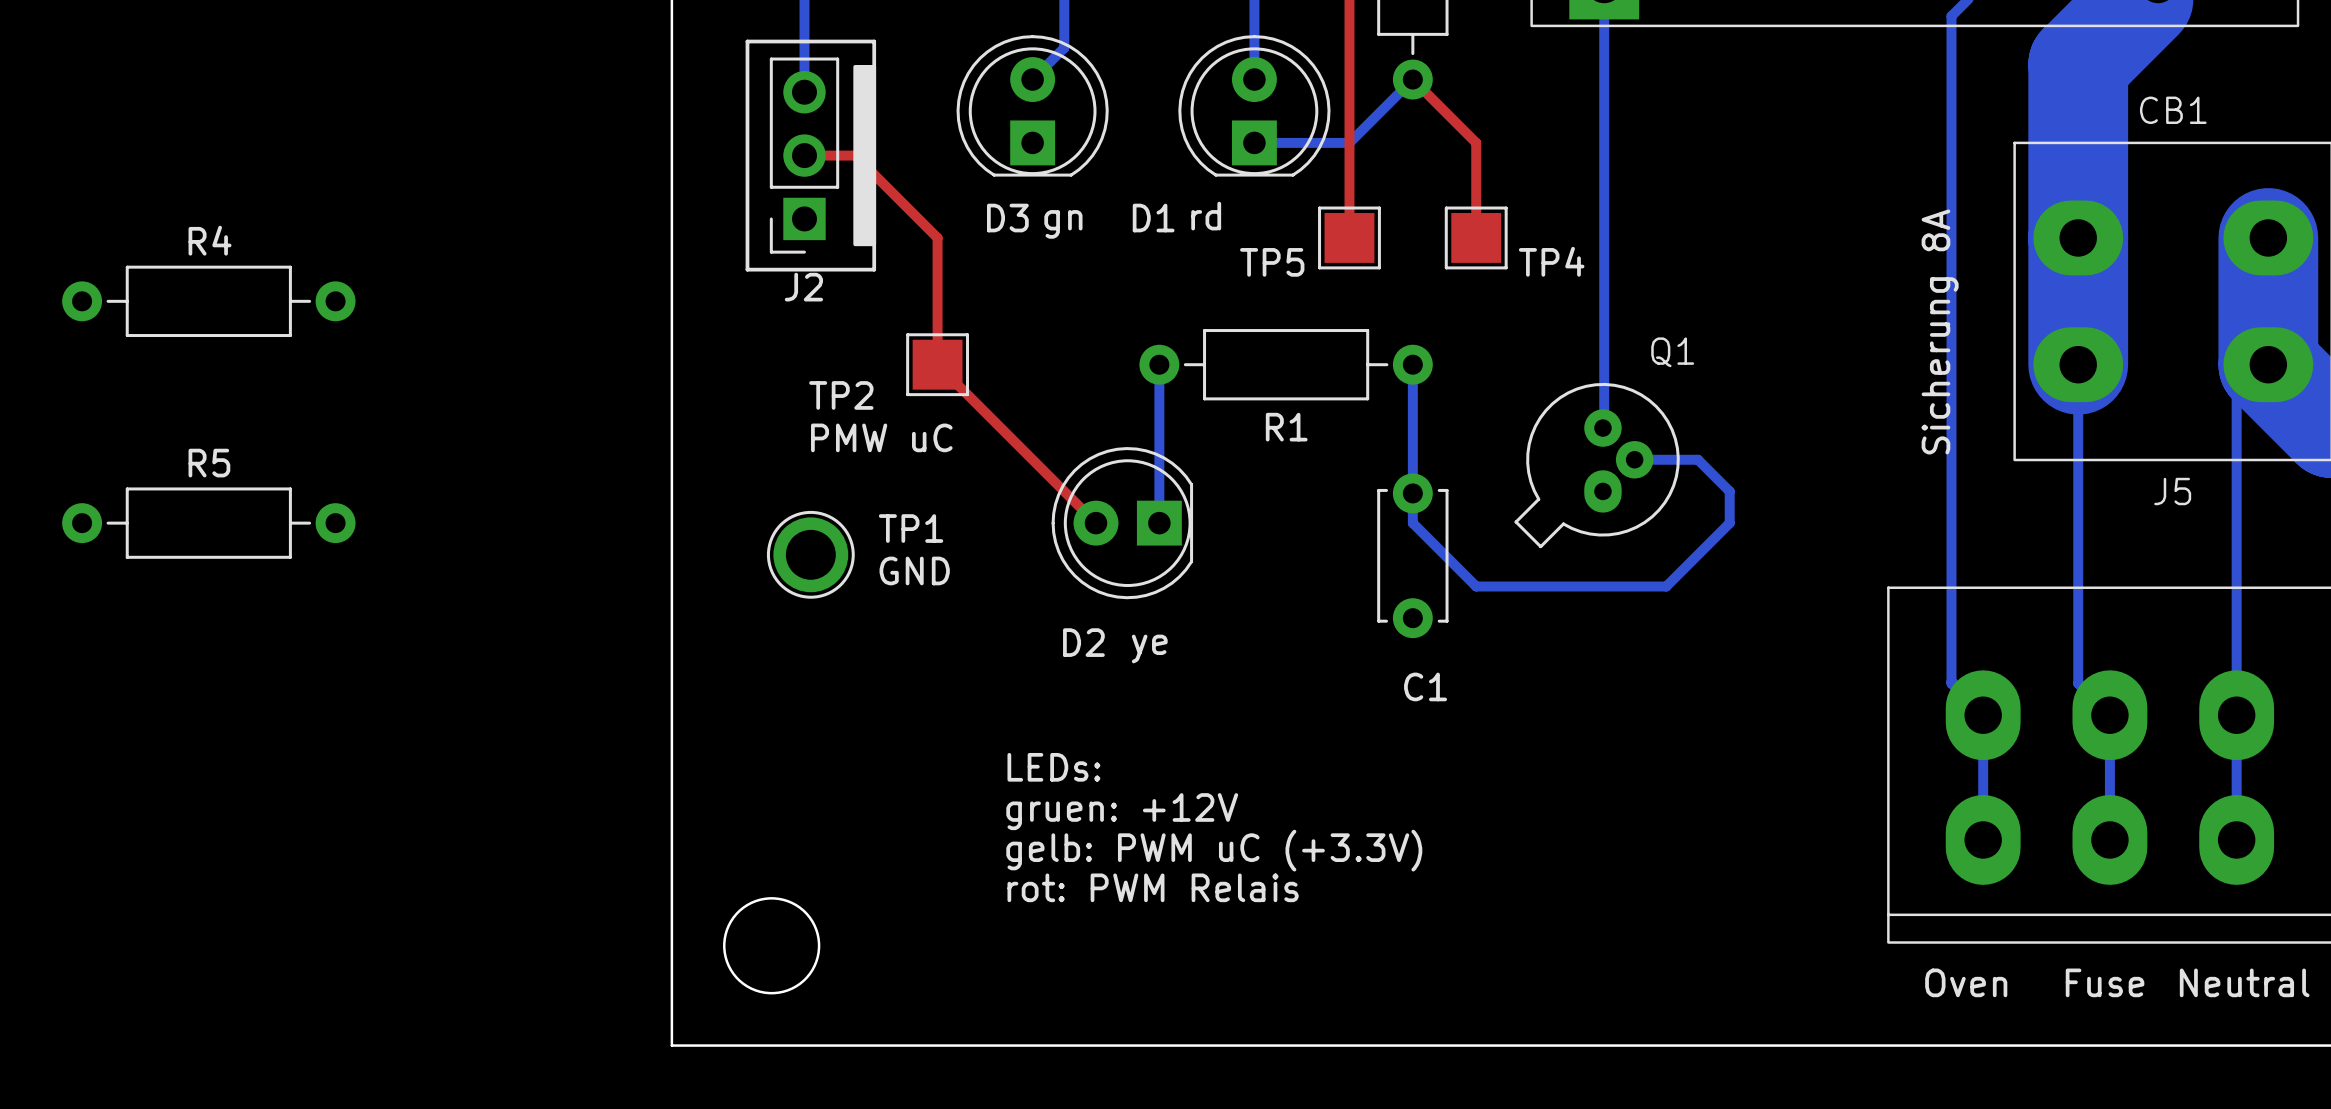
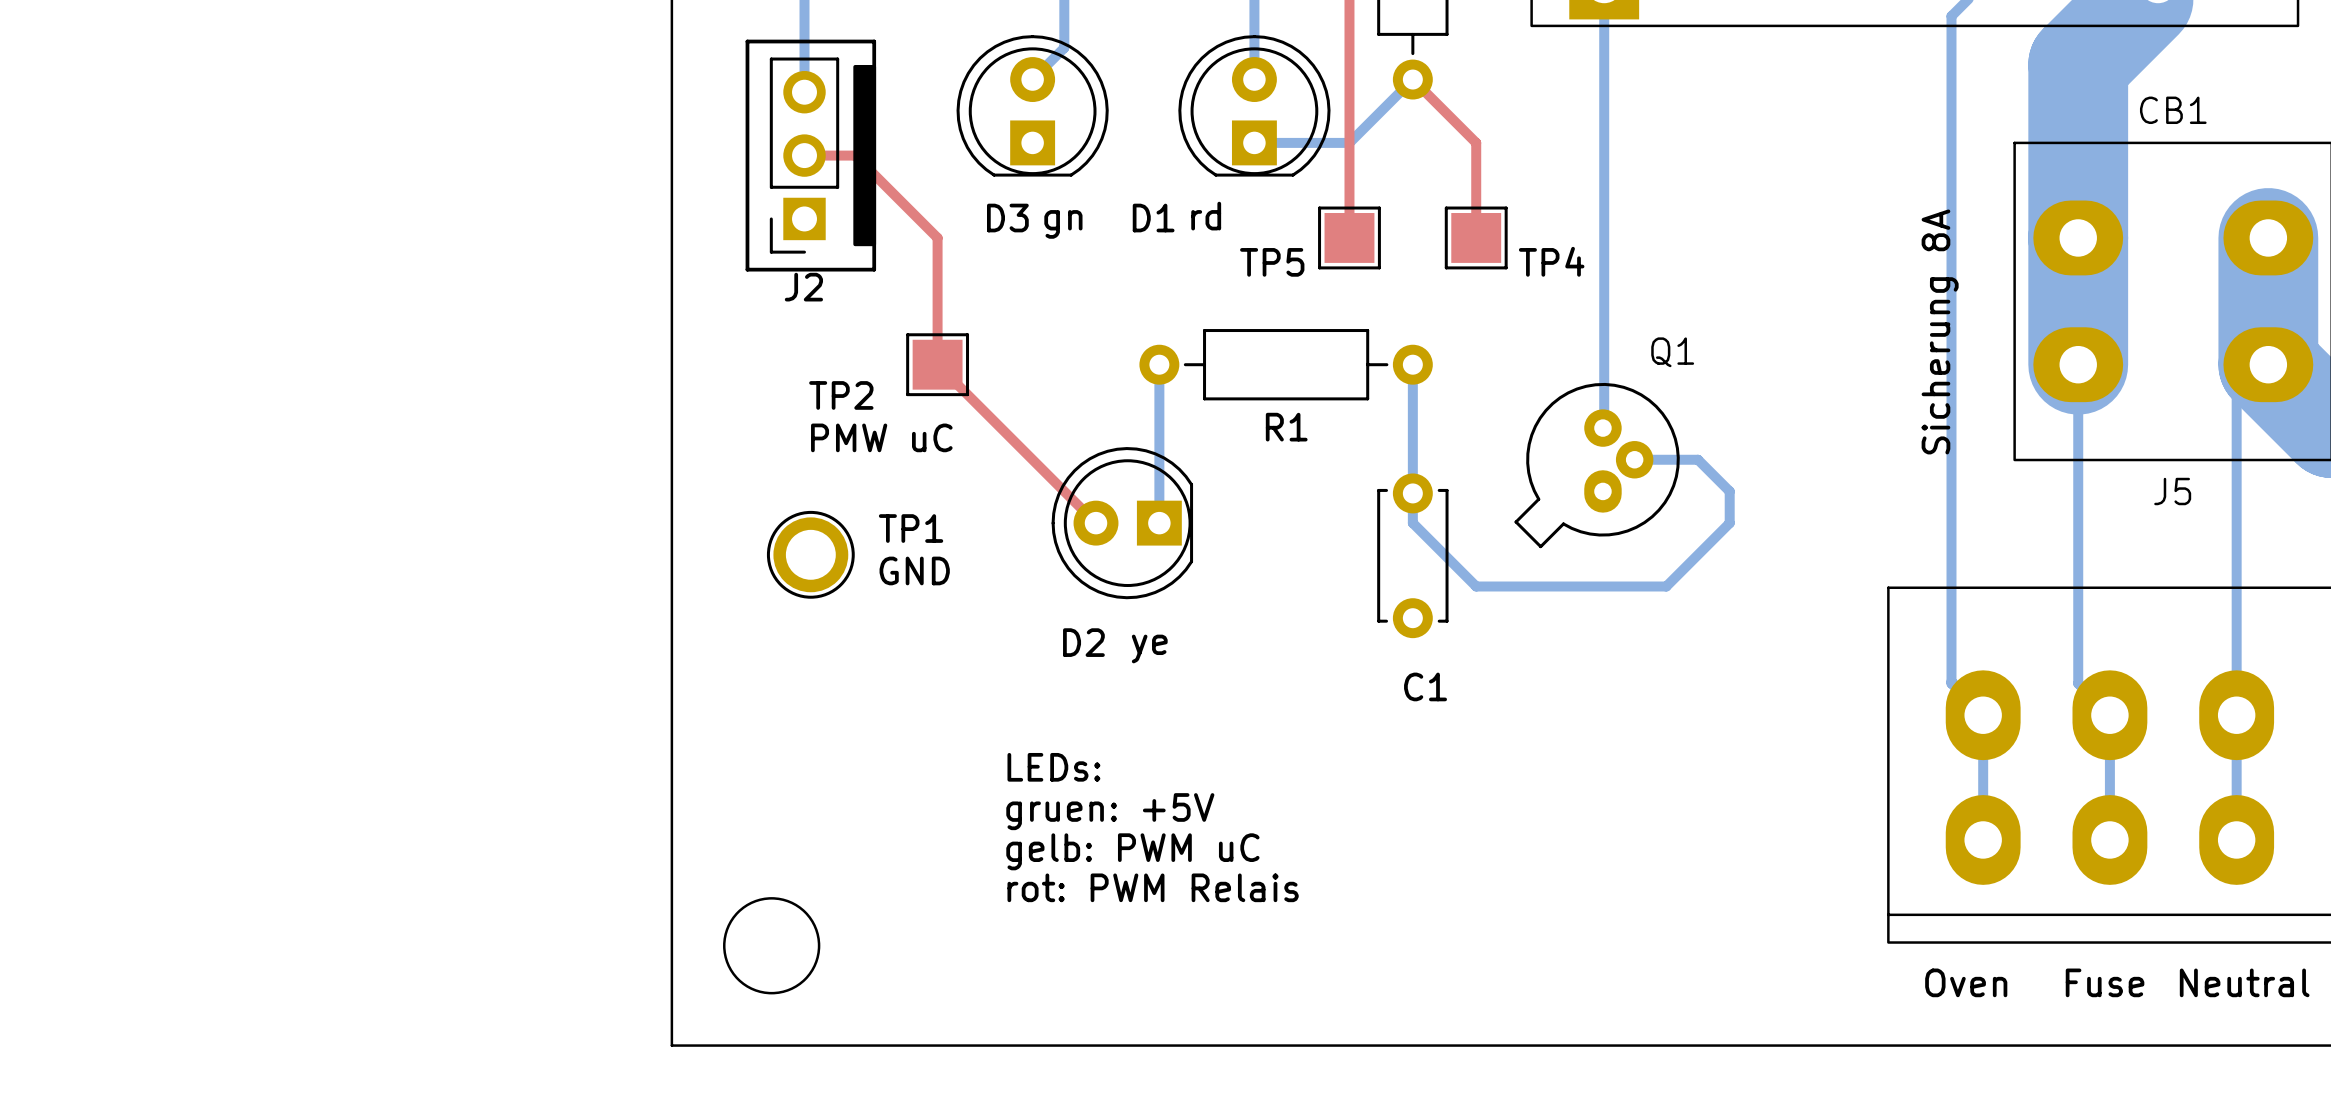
R4: (208, 301) -> none
R5: (208, 523) -> none
text: gruen: +12V (1122, 811) -> gruen: +5V (1110, 811)
text: gelb: PWM uC (+3.3V) (1214, 850) -> gelb: PWM uC (1132, 851)

